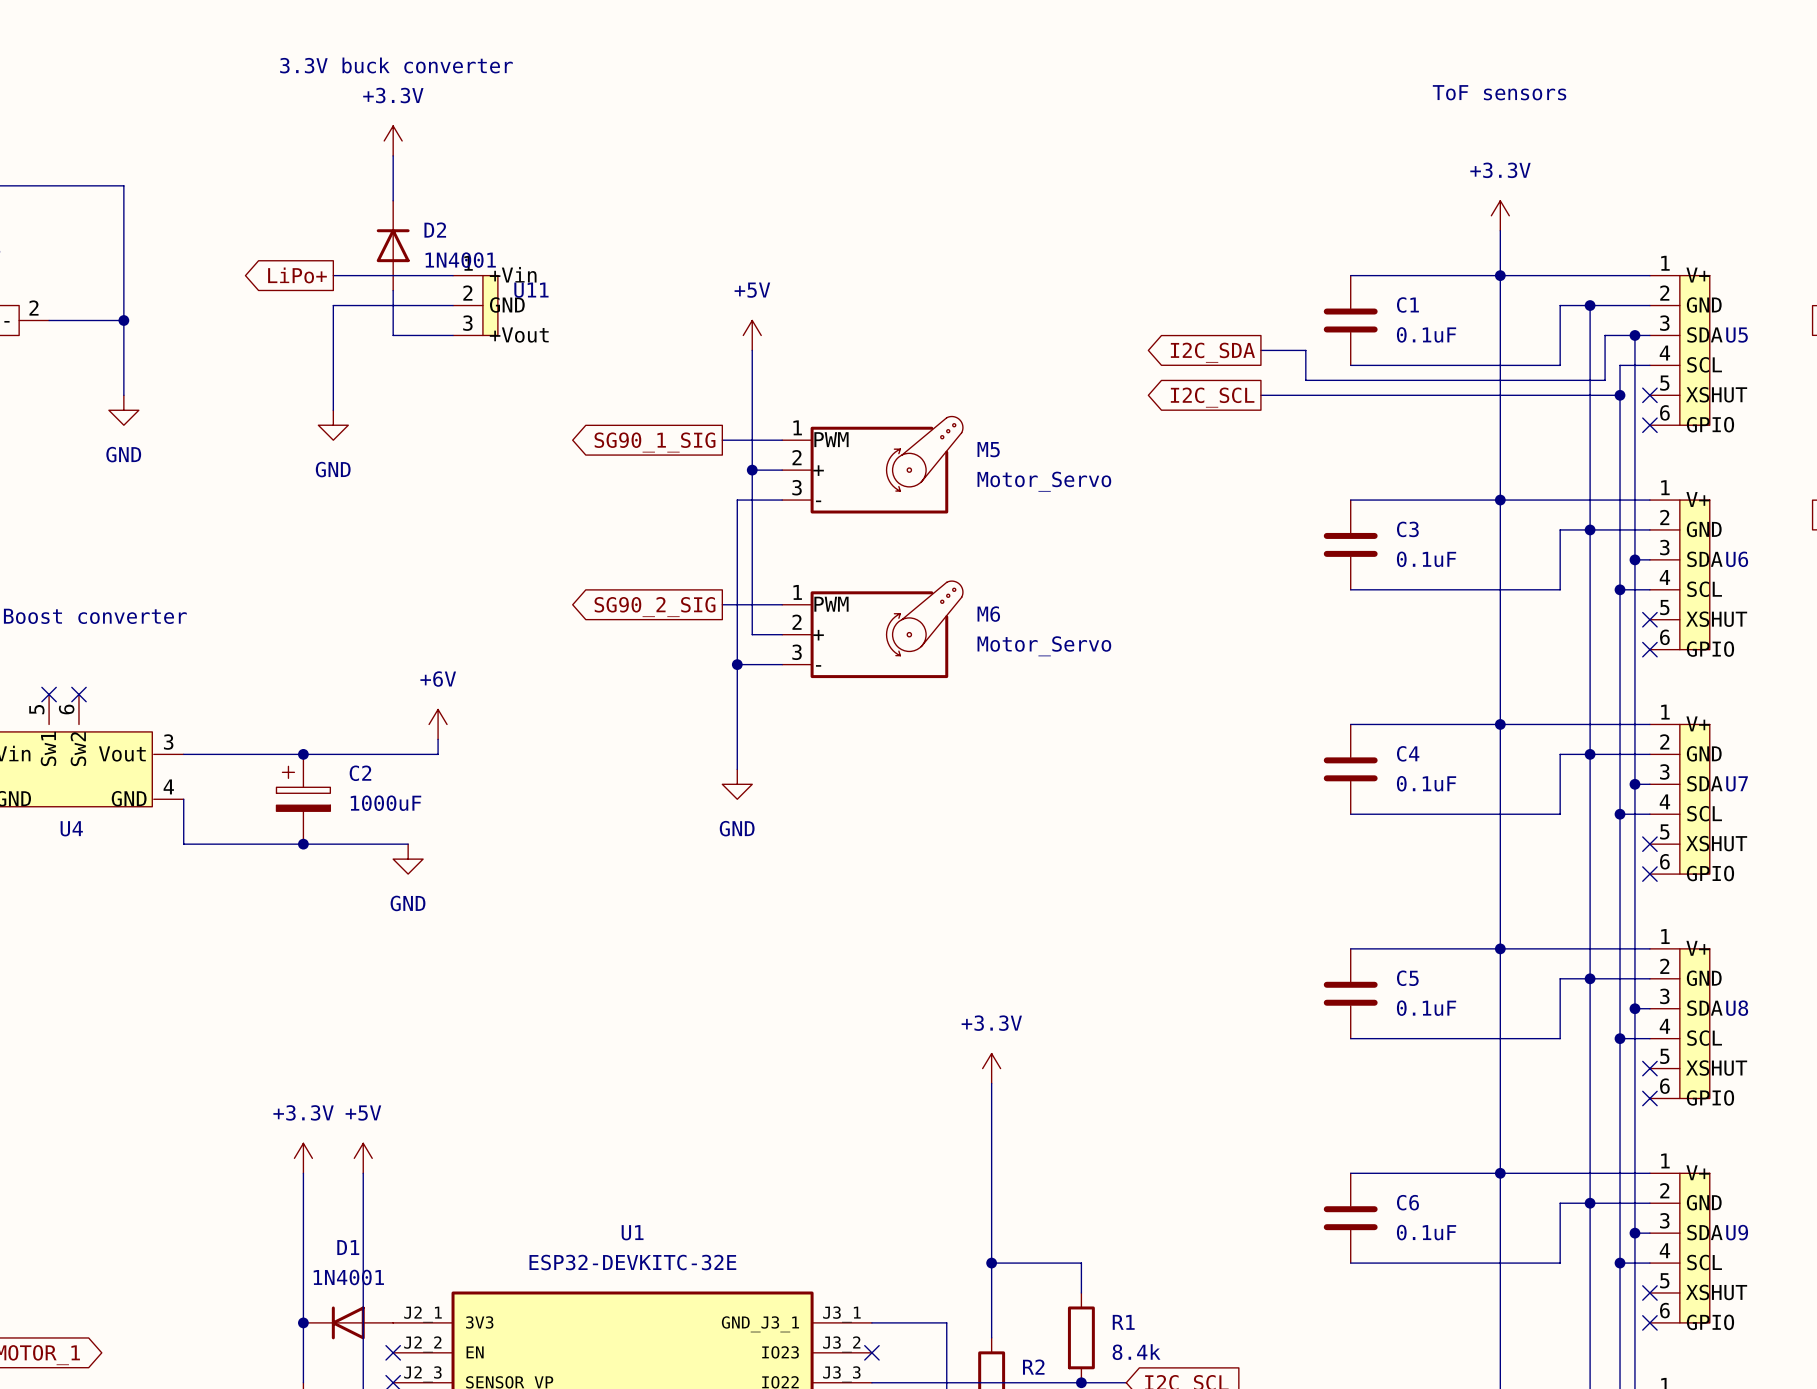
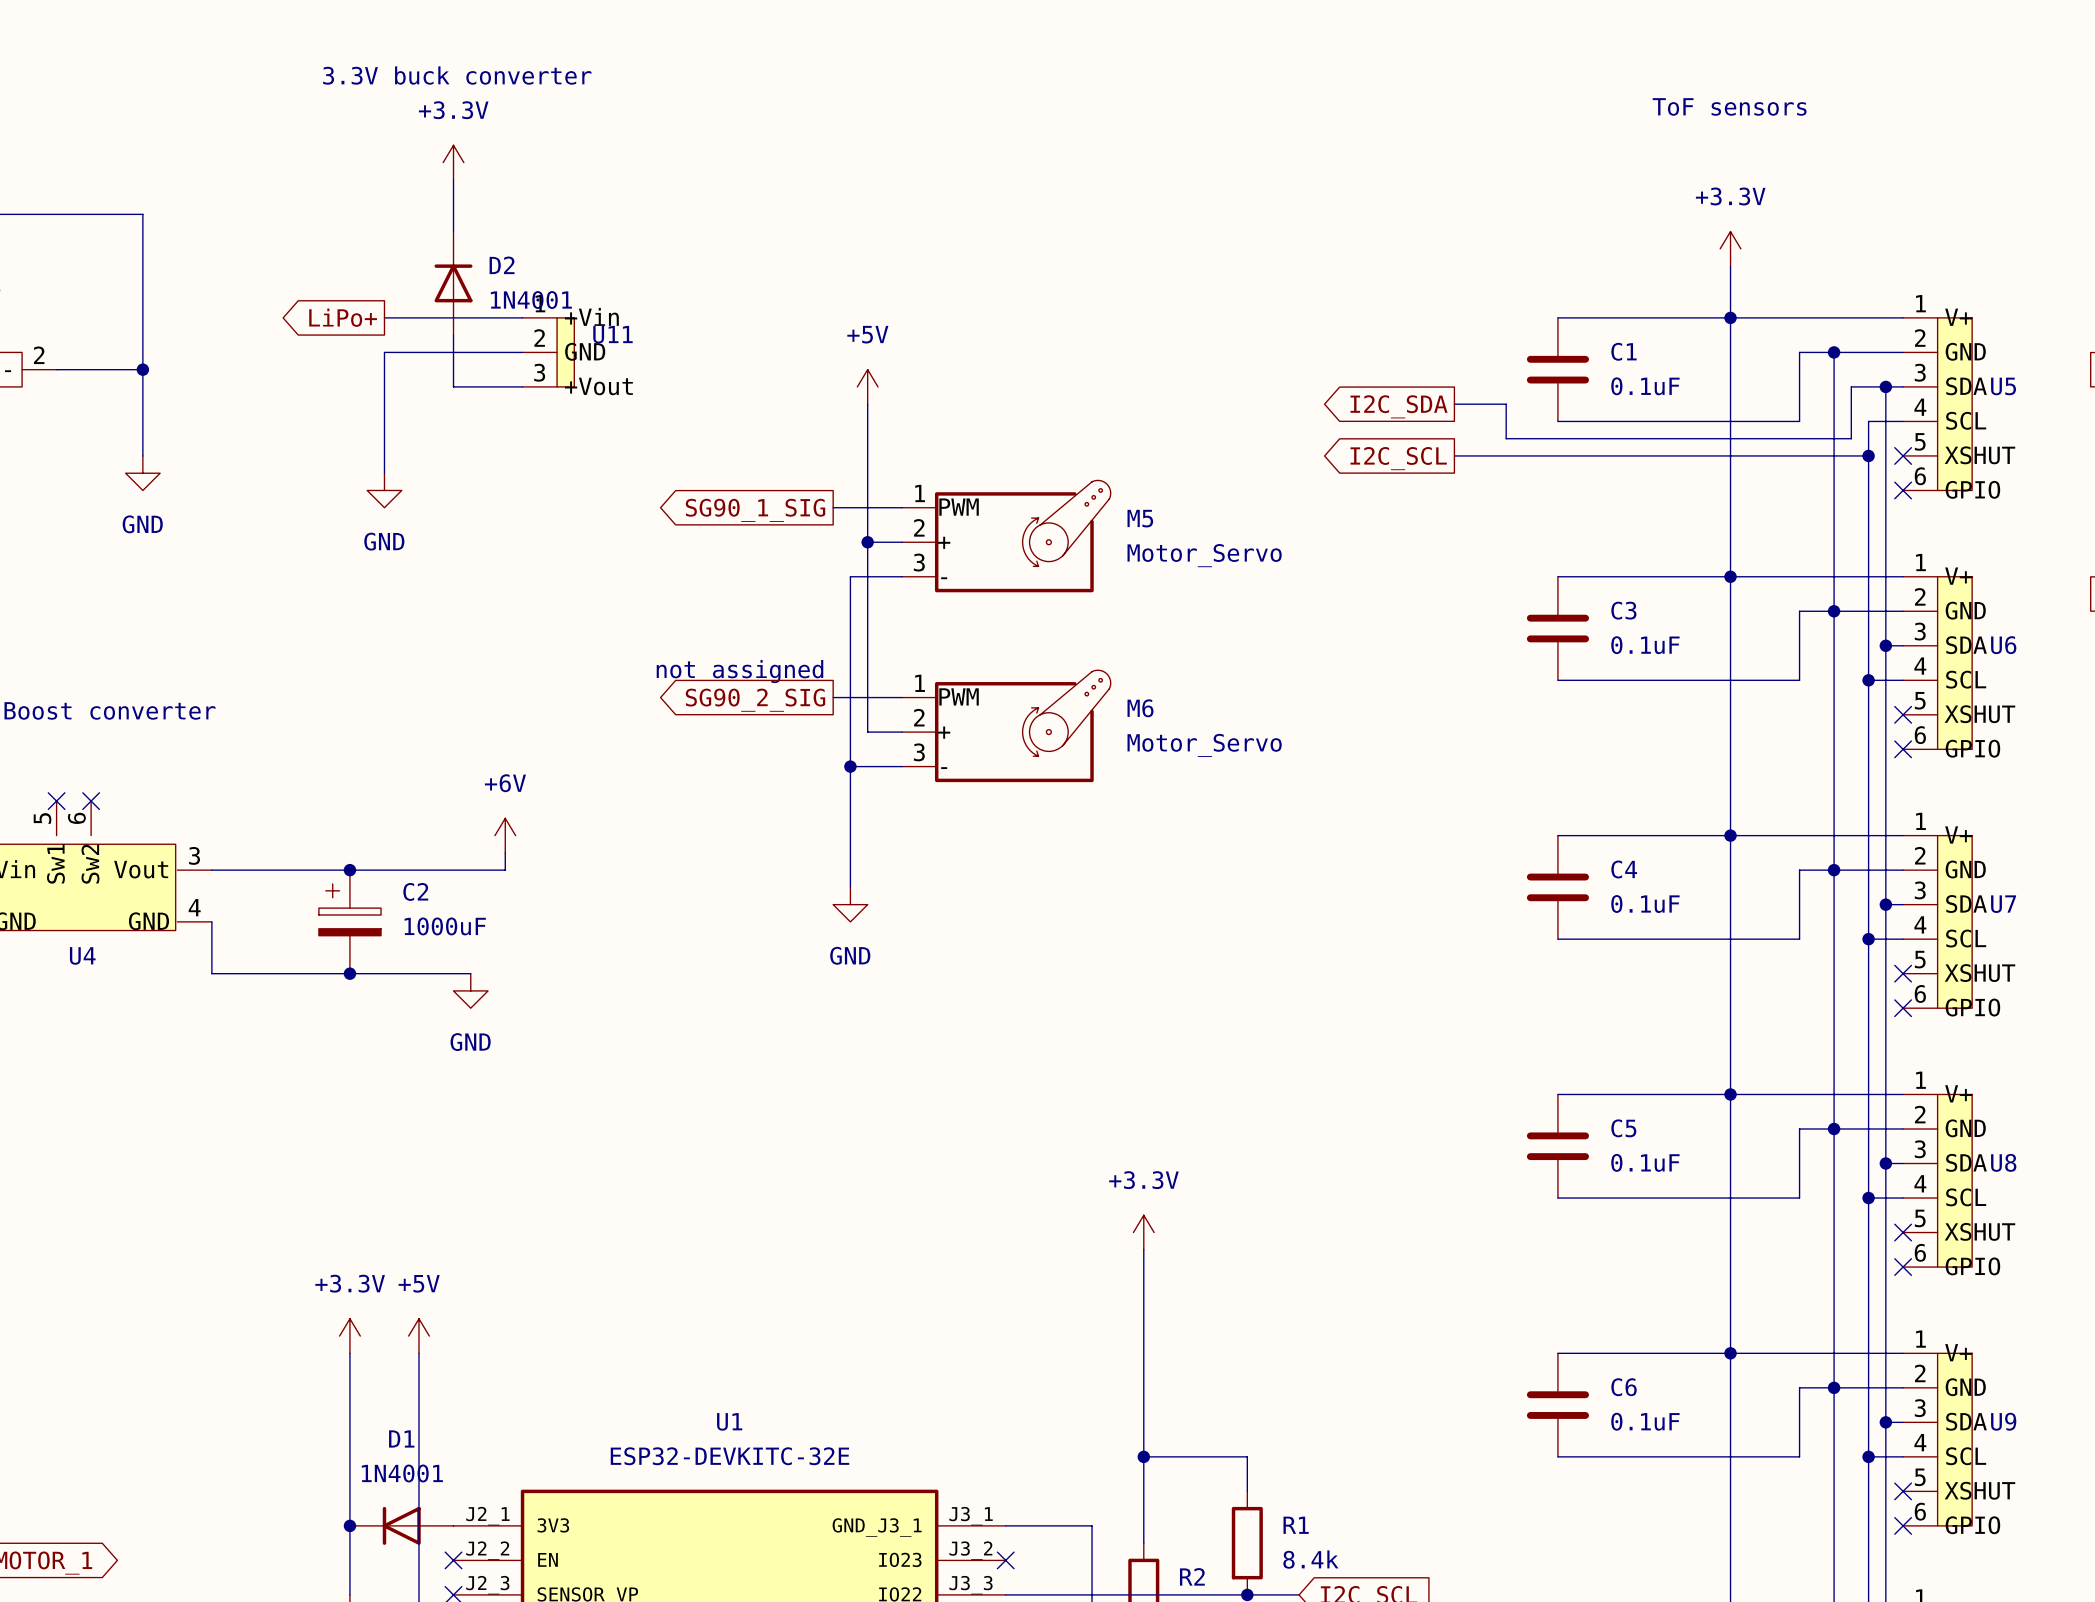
text: none -> not assigned (739, 671)

